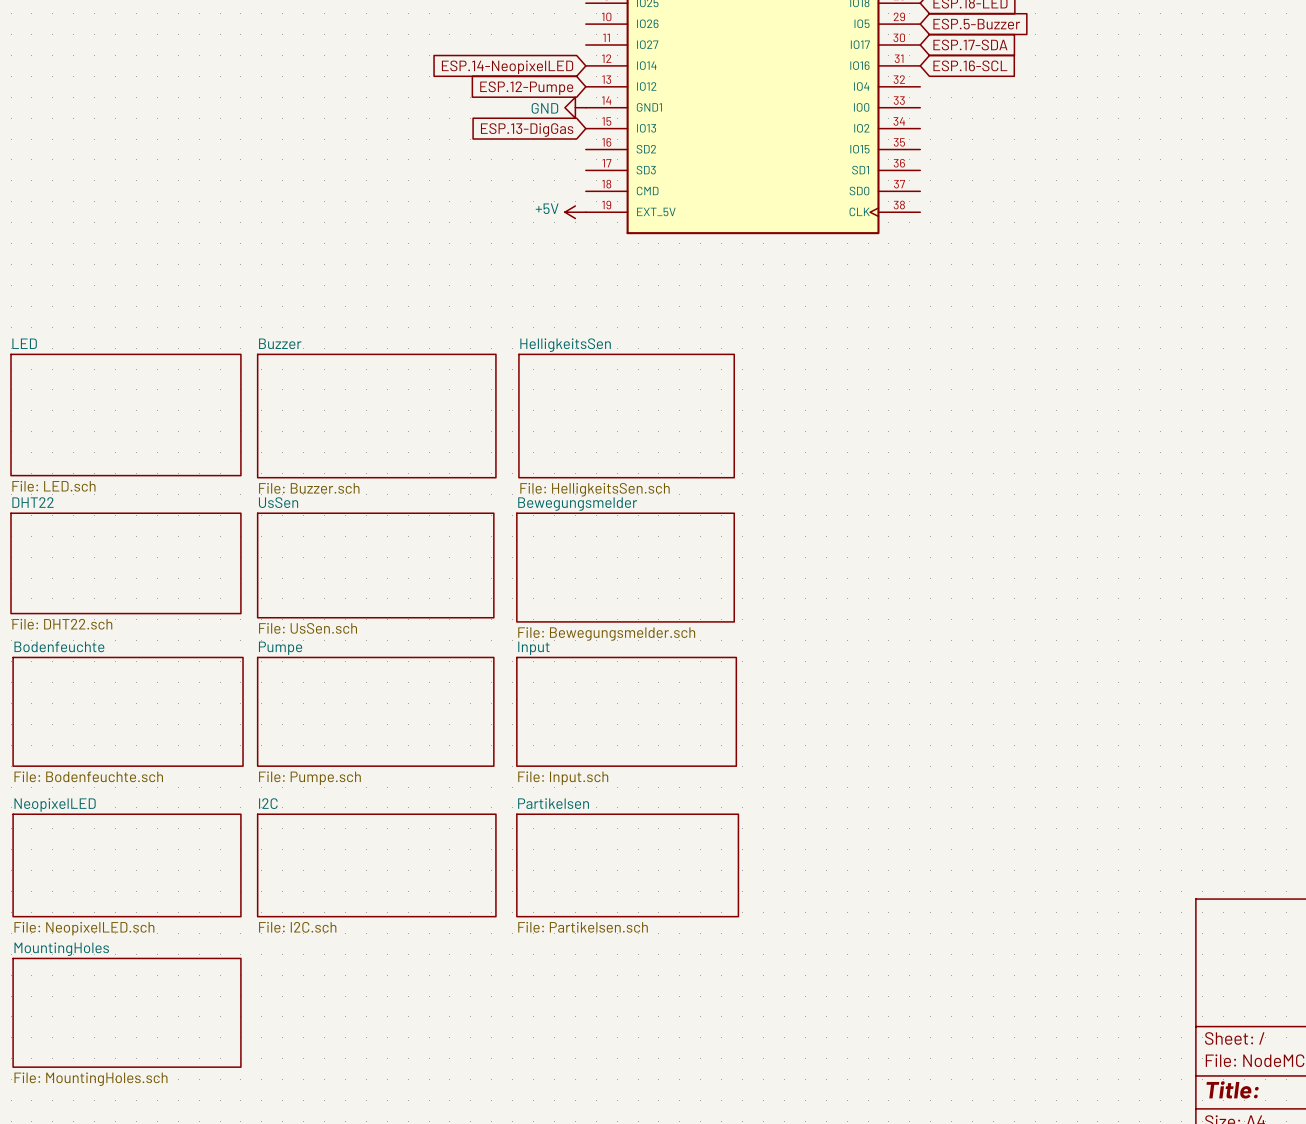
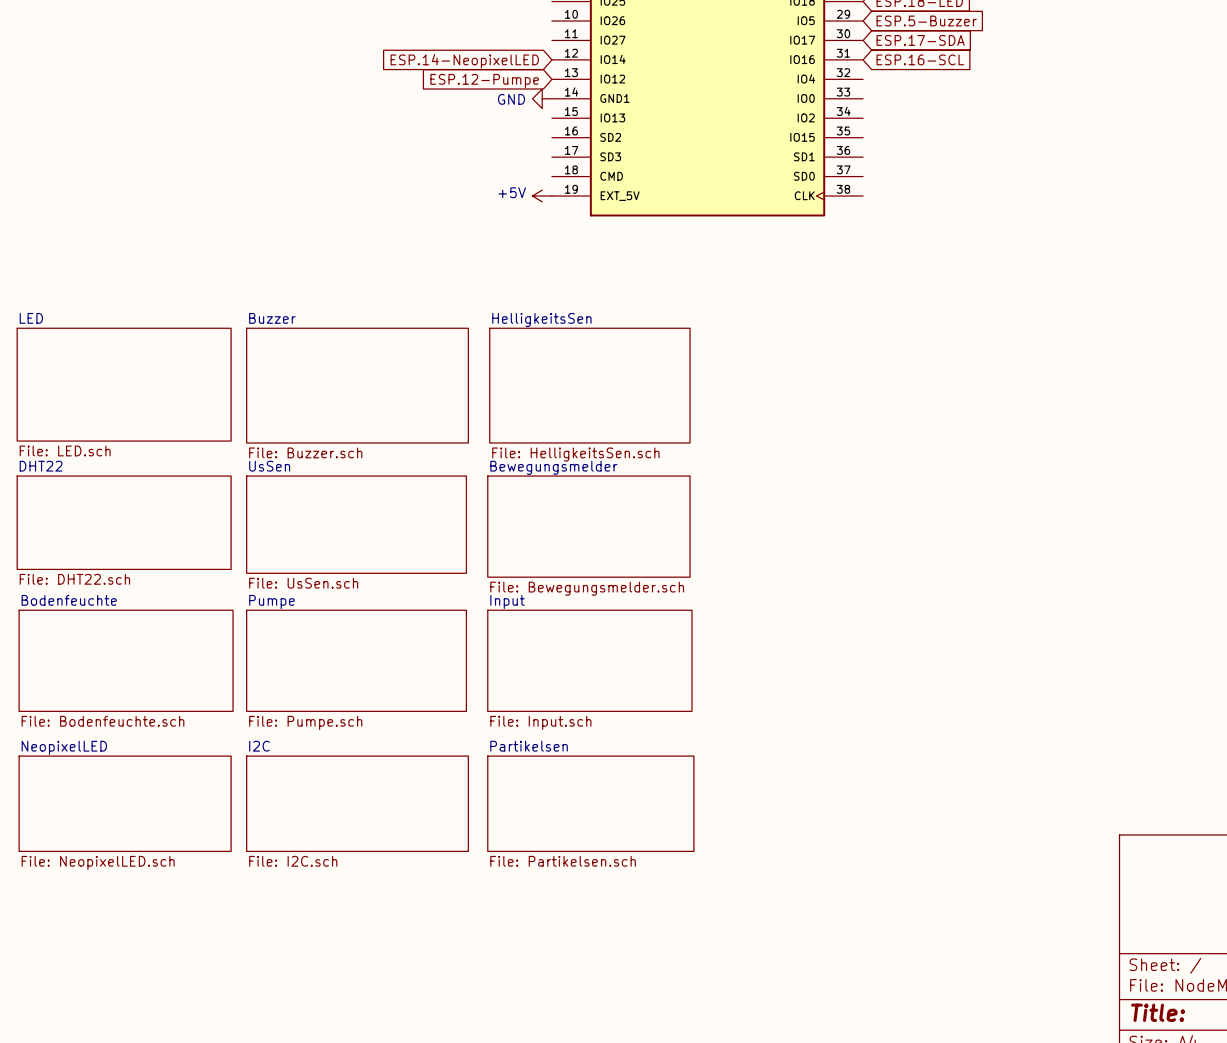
global label: ESP.13-DigGas (527, 130) -> none
sheet MountingHoles: File: MountingHoles.sch (127, 1012) -> none

